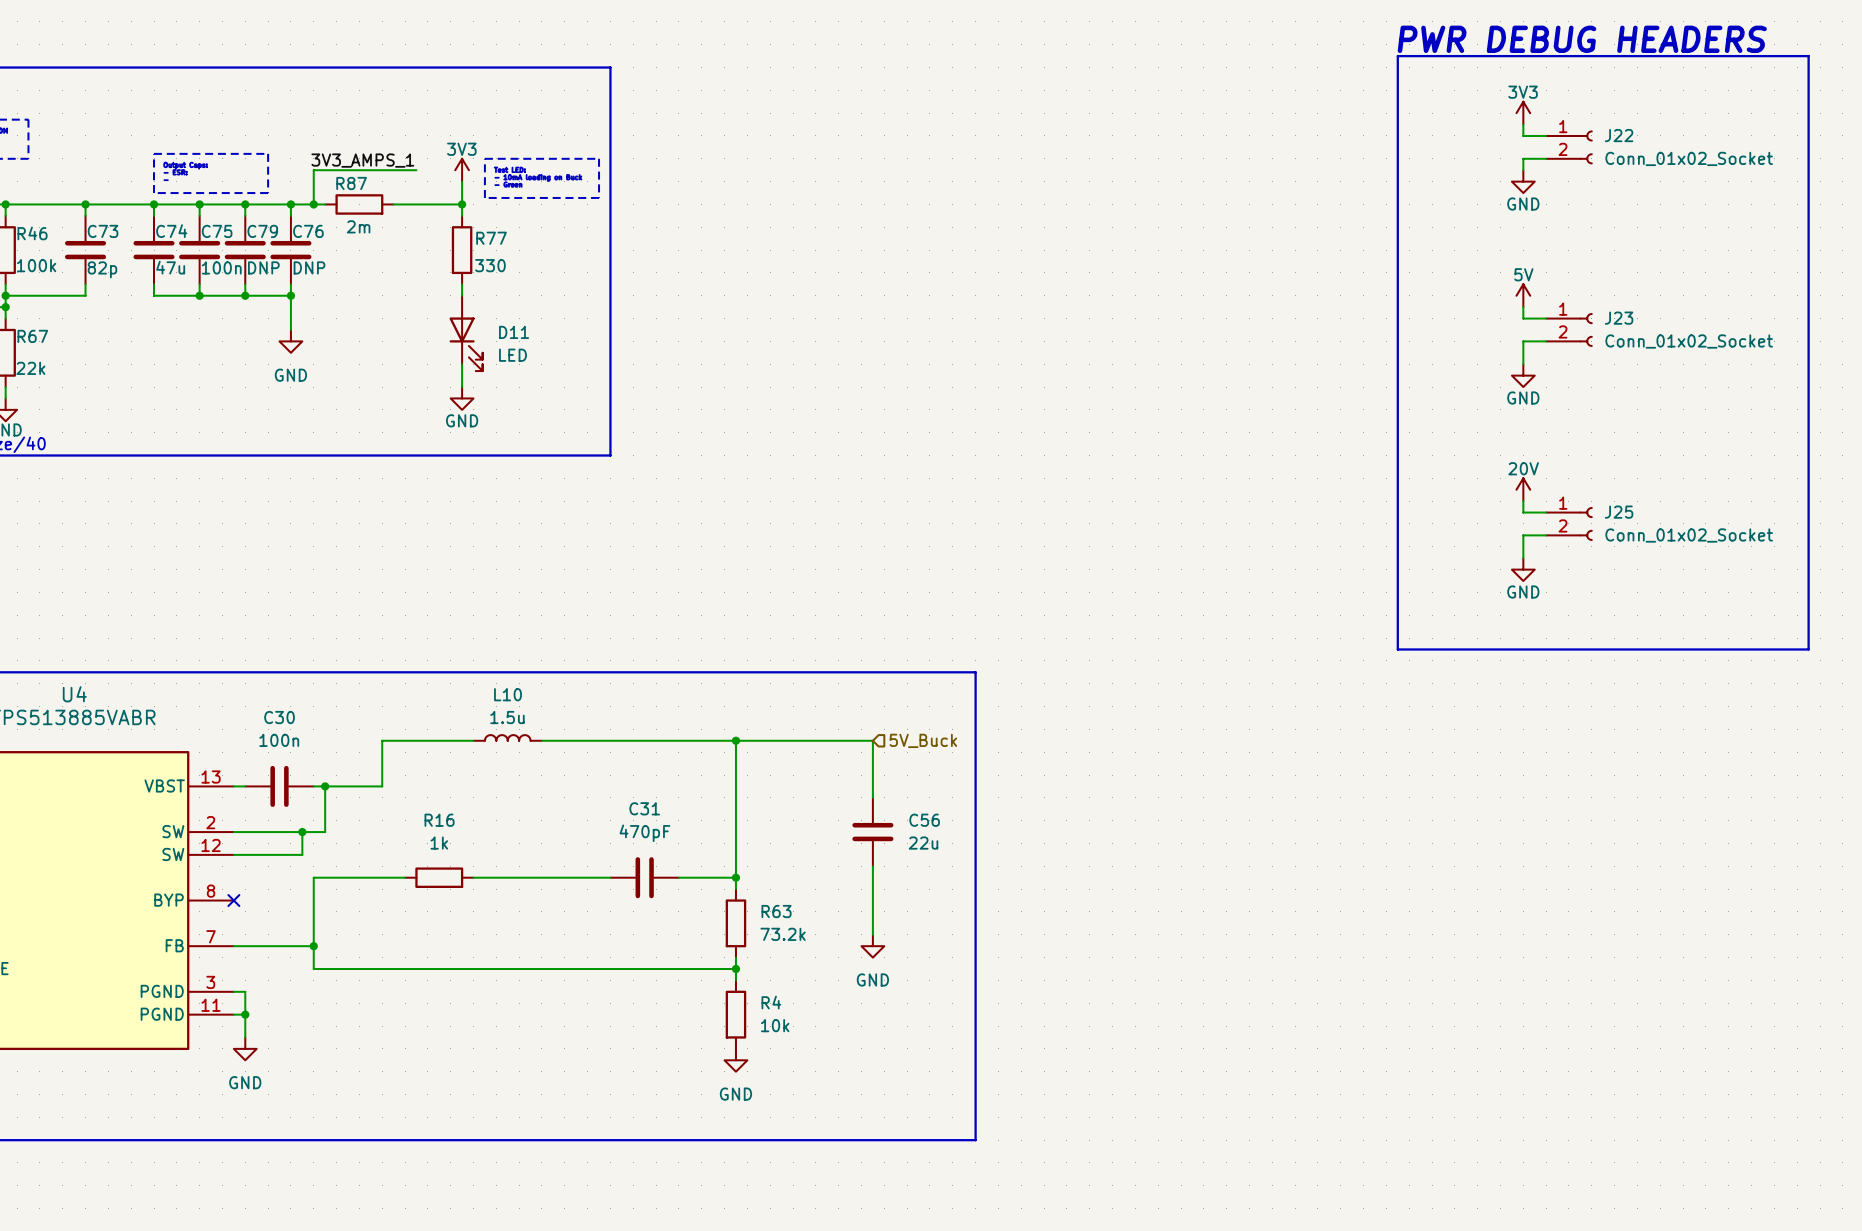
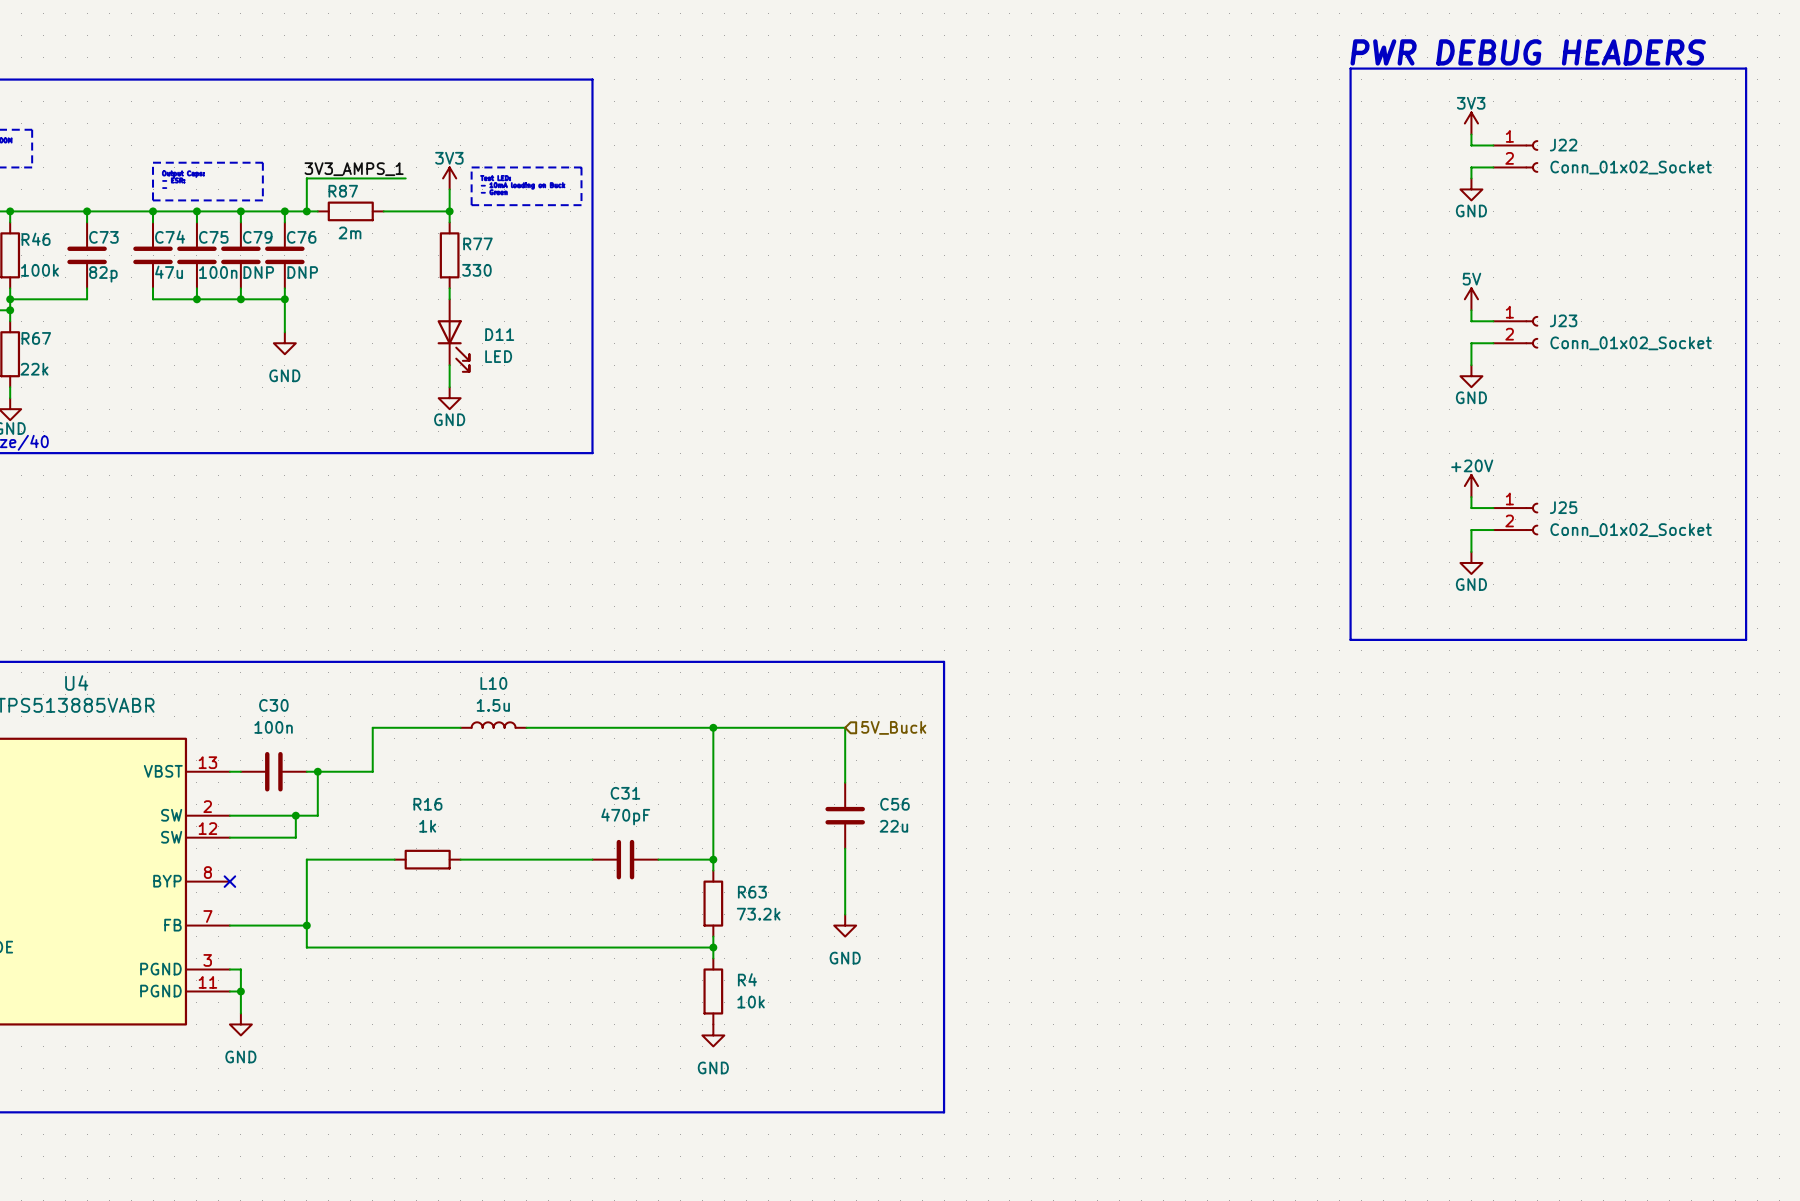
power symbol: 20V (1523, 489) -> +20V (1471, 486)

